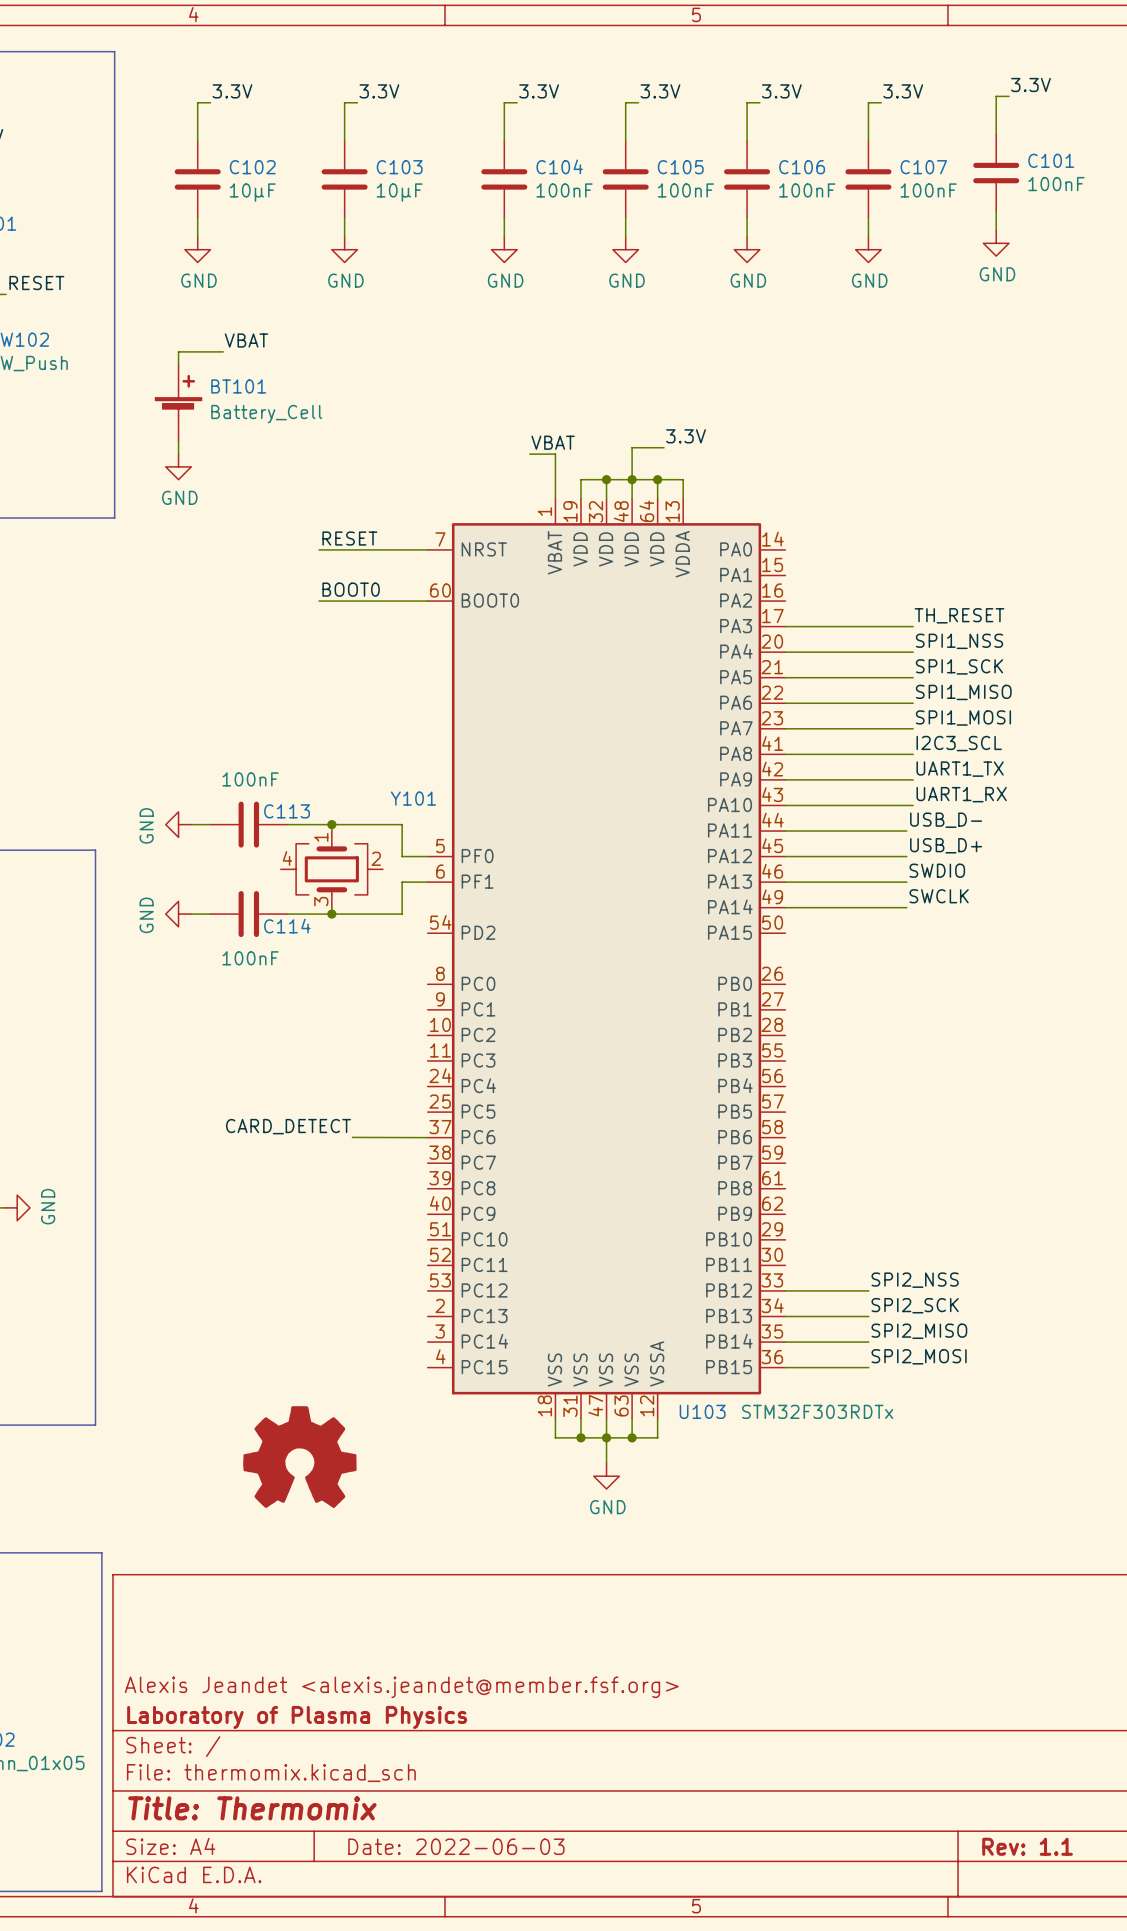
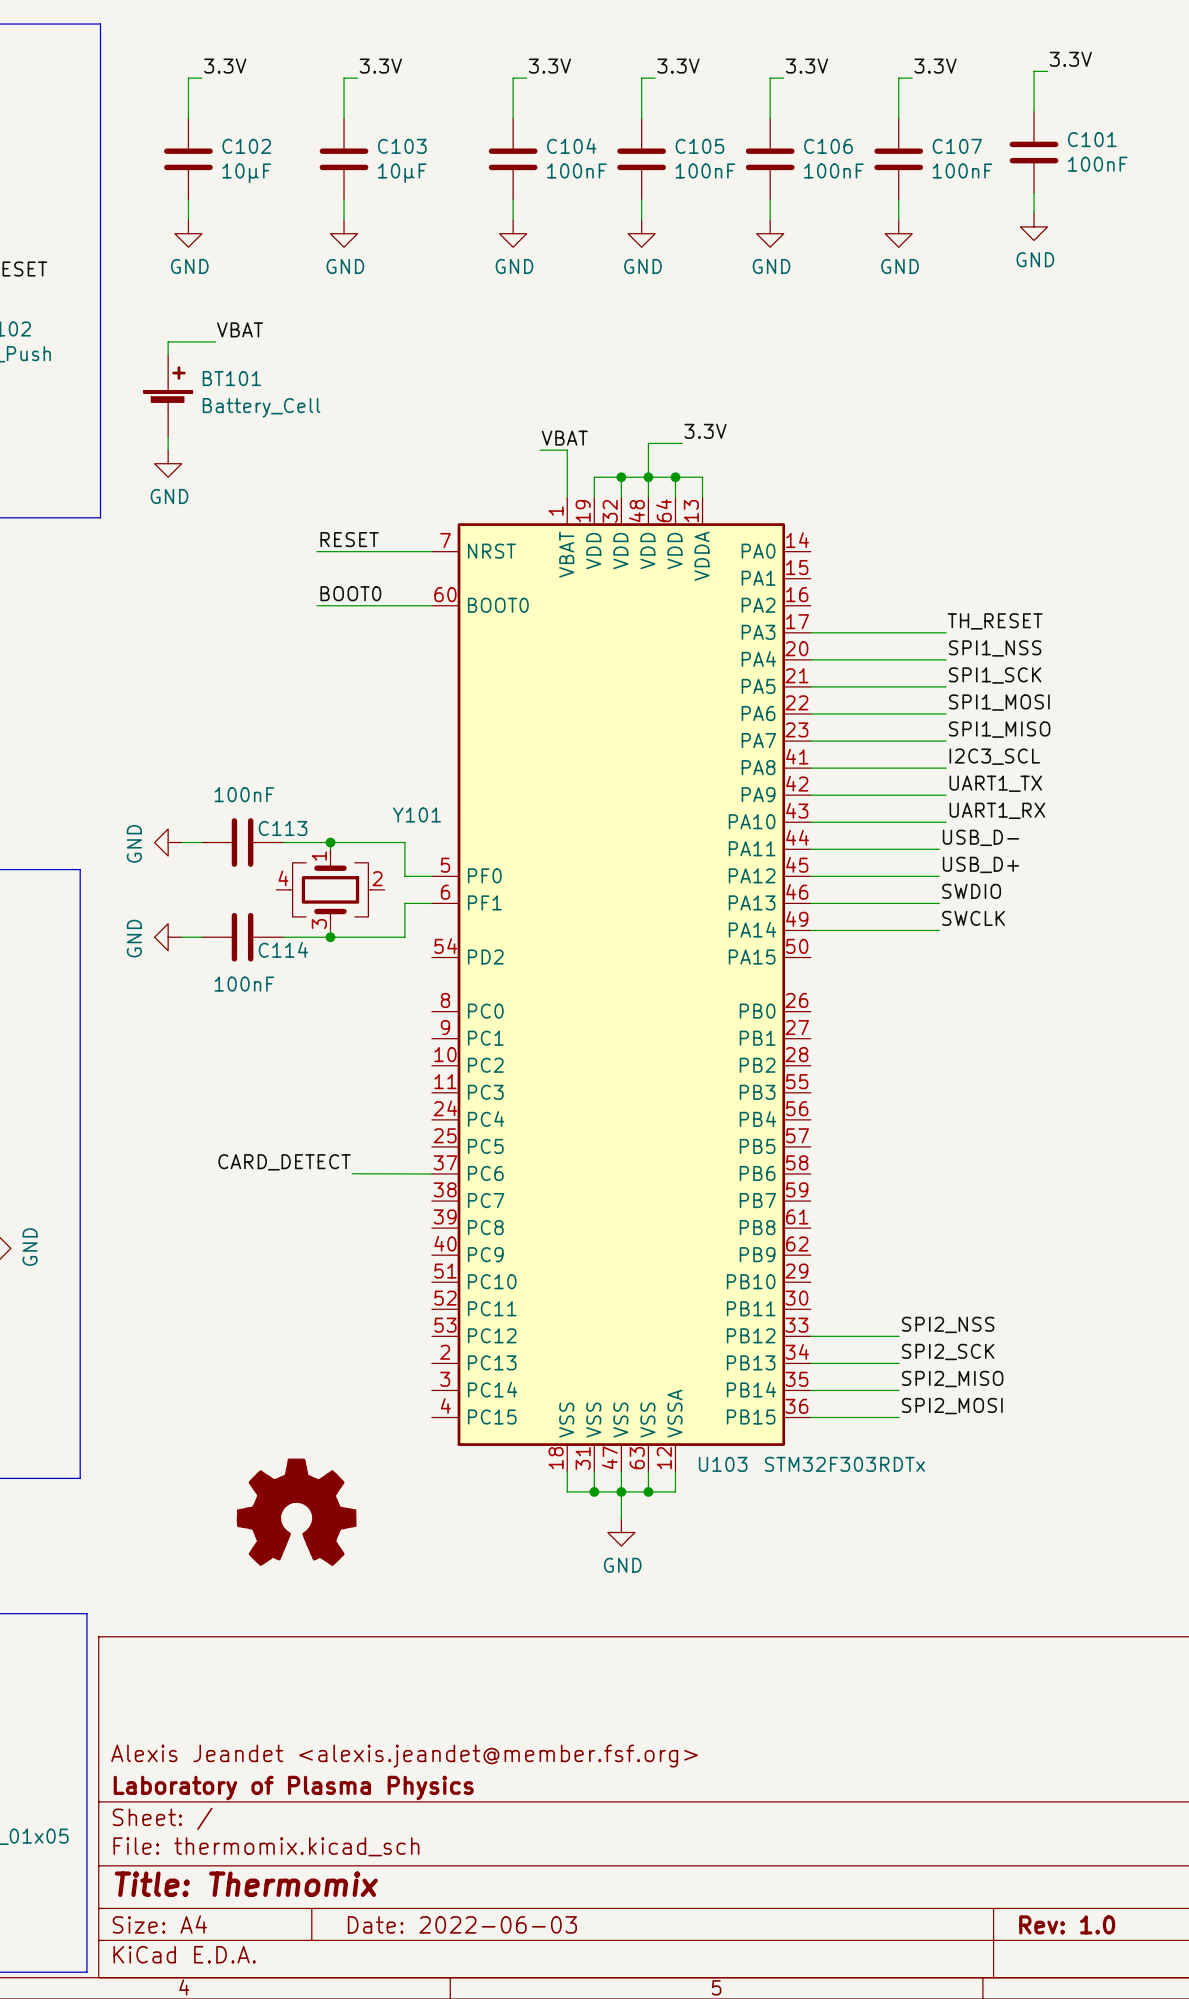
label: SPI1_MISO (963, 692) -> SPI1_MOSI (999, 702)
label: SPI1_MOSI (963, 718) -> SPI1_MISO (999, 729)
title block: Rev: 1.1 (1027, 1846) -> Rev: 1.0 (1067, 1924)

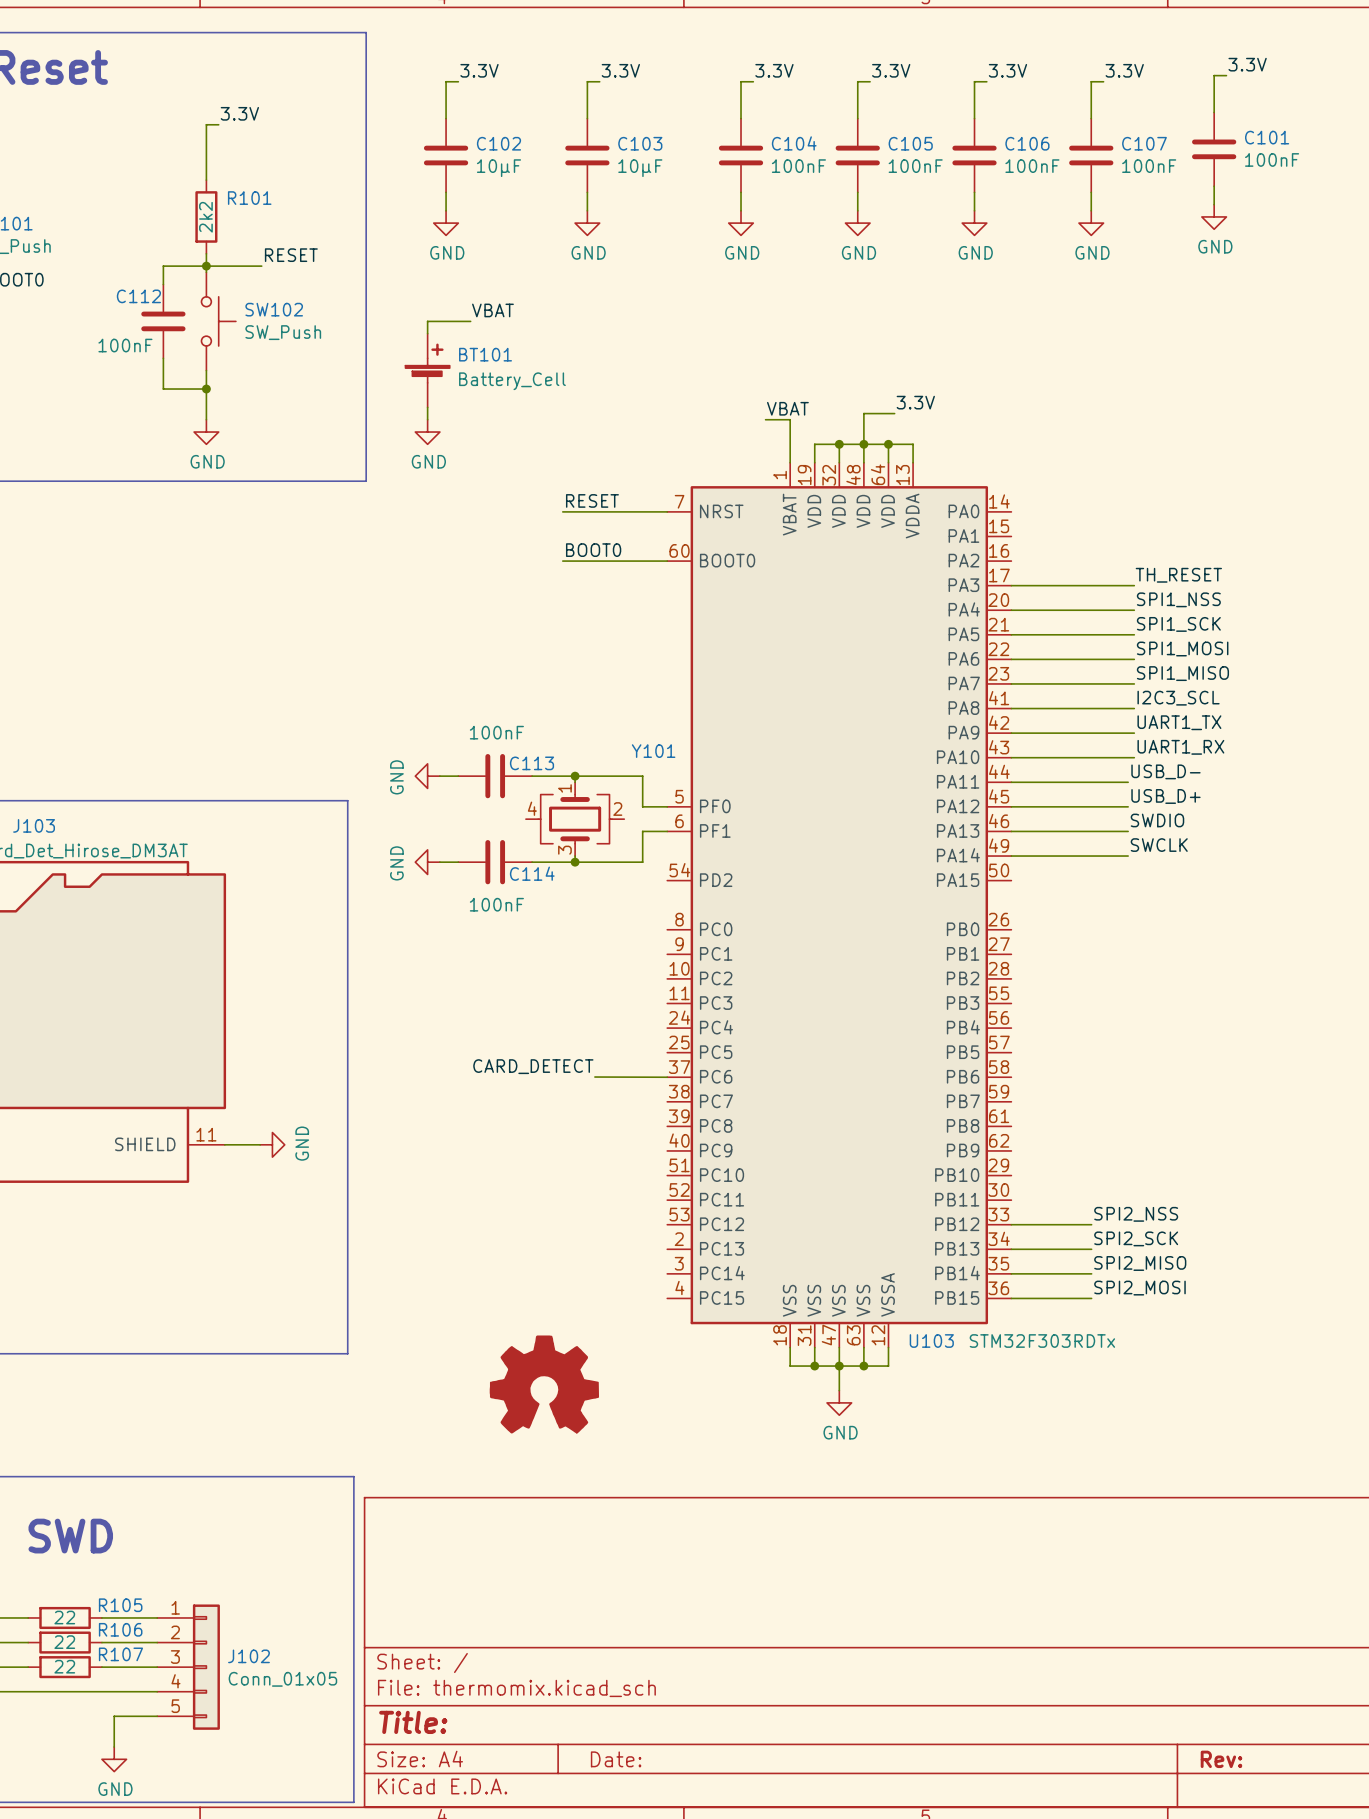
title block: Alexis Jeandet <alexis.jeandet@member.fsf.org> (404, 1756) -> none
title block: Laboratory of Plasma Physics (293, 1788) -> none
title block: Title: Thermomix (246, 1884) -> Title: (413, 1722)
title block: Date: 2022-06-03 (462, 1924) -> Date: (616, 1759)
title block: Rev: 1.0 (1067, 1924) -> Rev: (1221, 1759)

